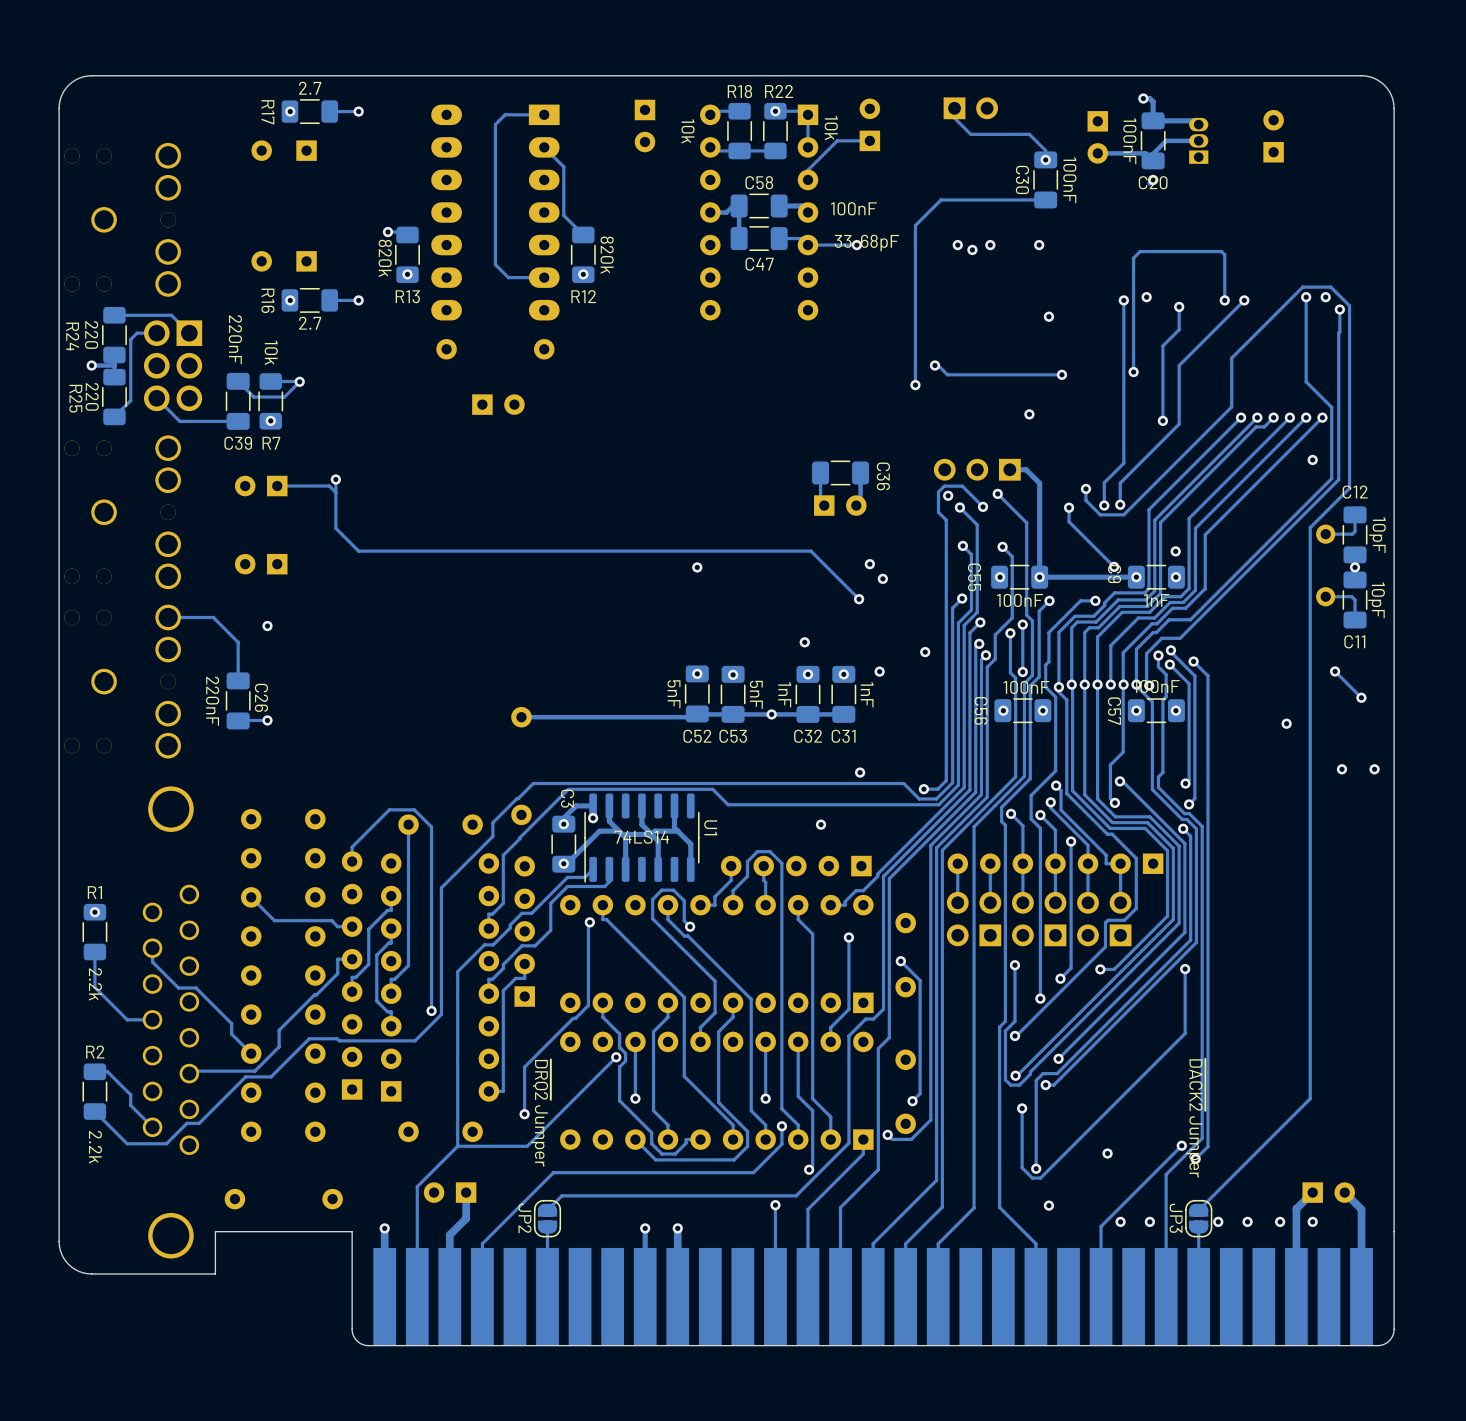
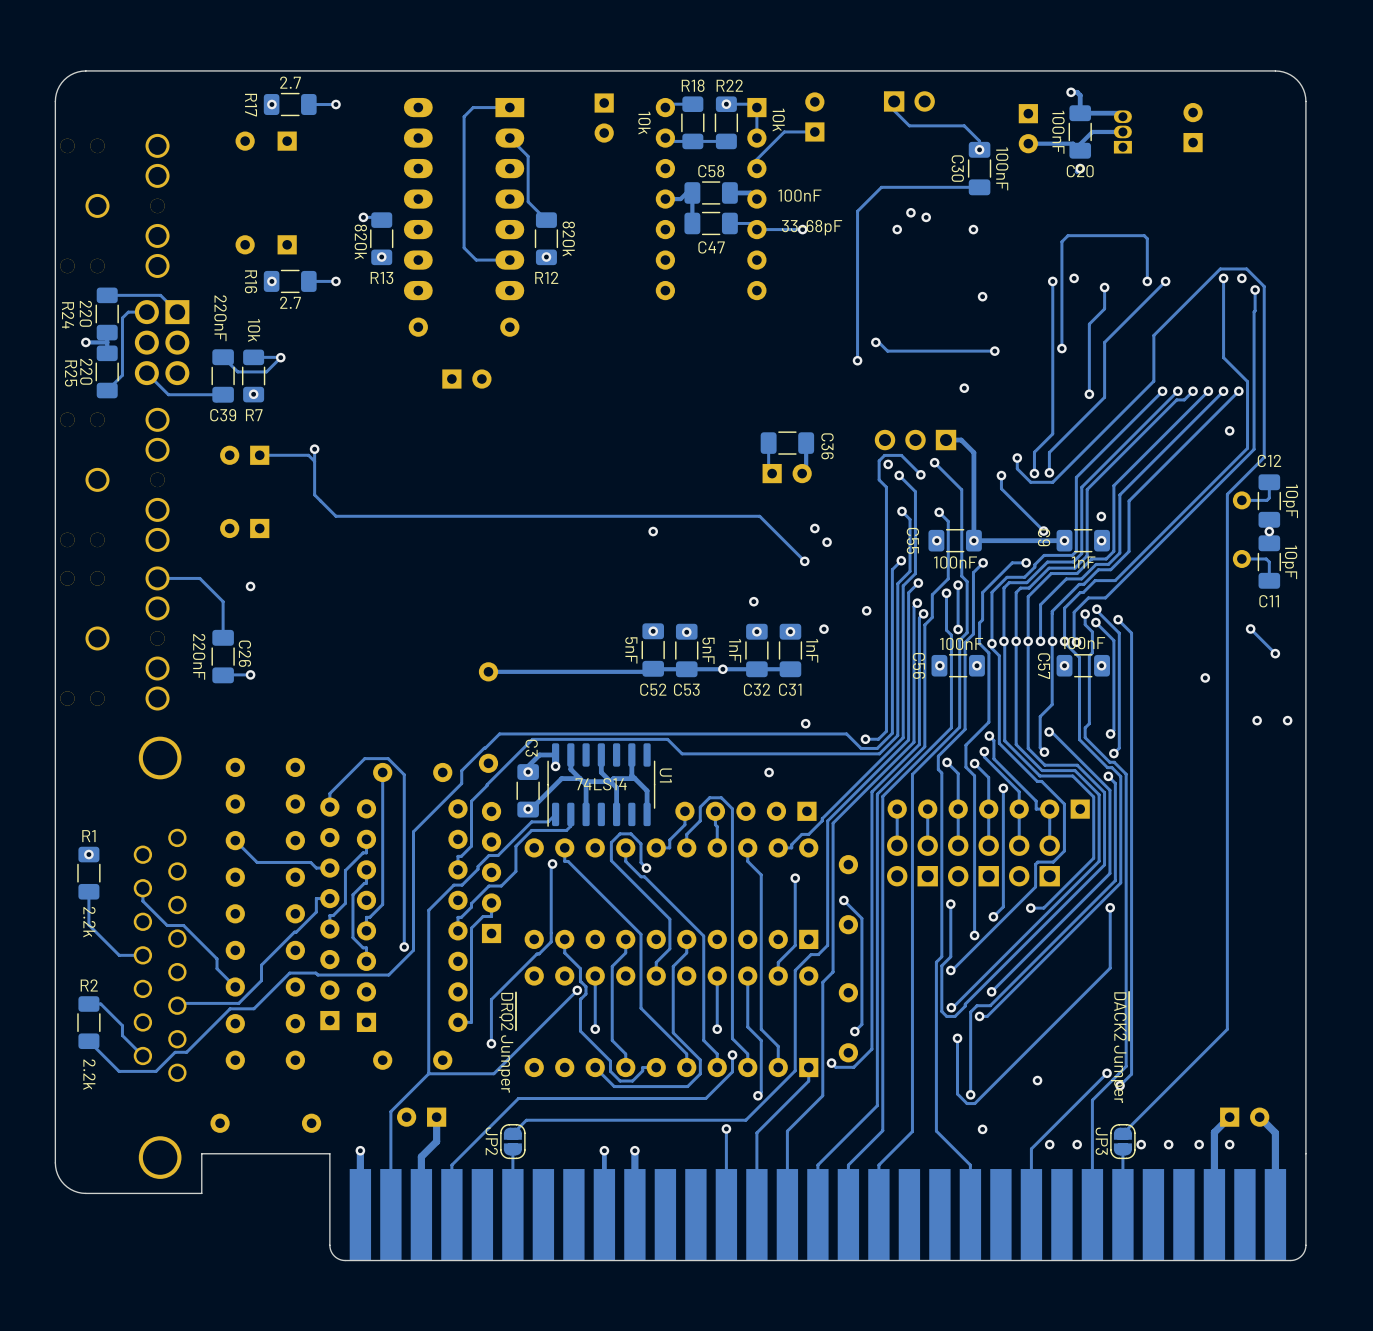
via: none -> (910, 212)
via: none -> (926, 217)
via: (990, 245) -> none
via: (972, 249) -> none

